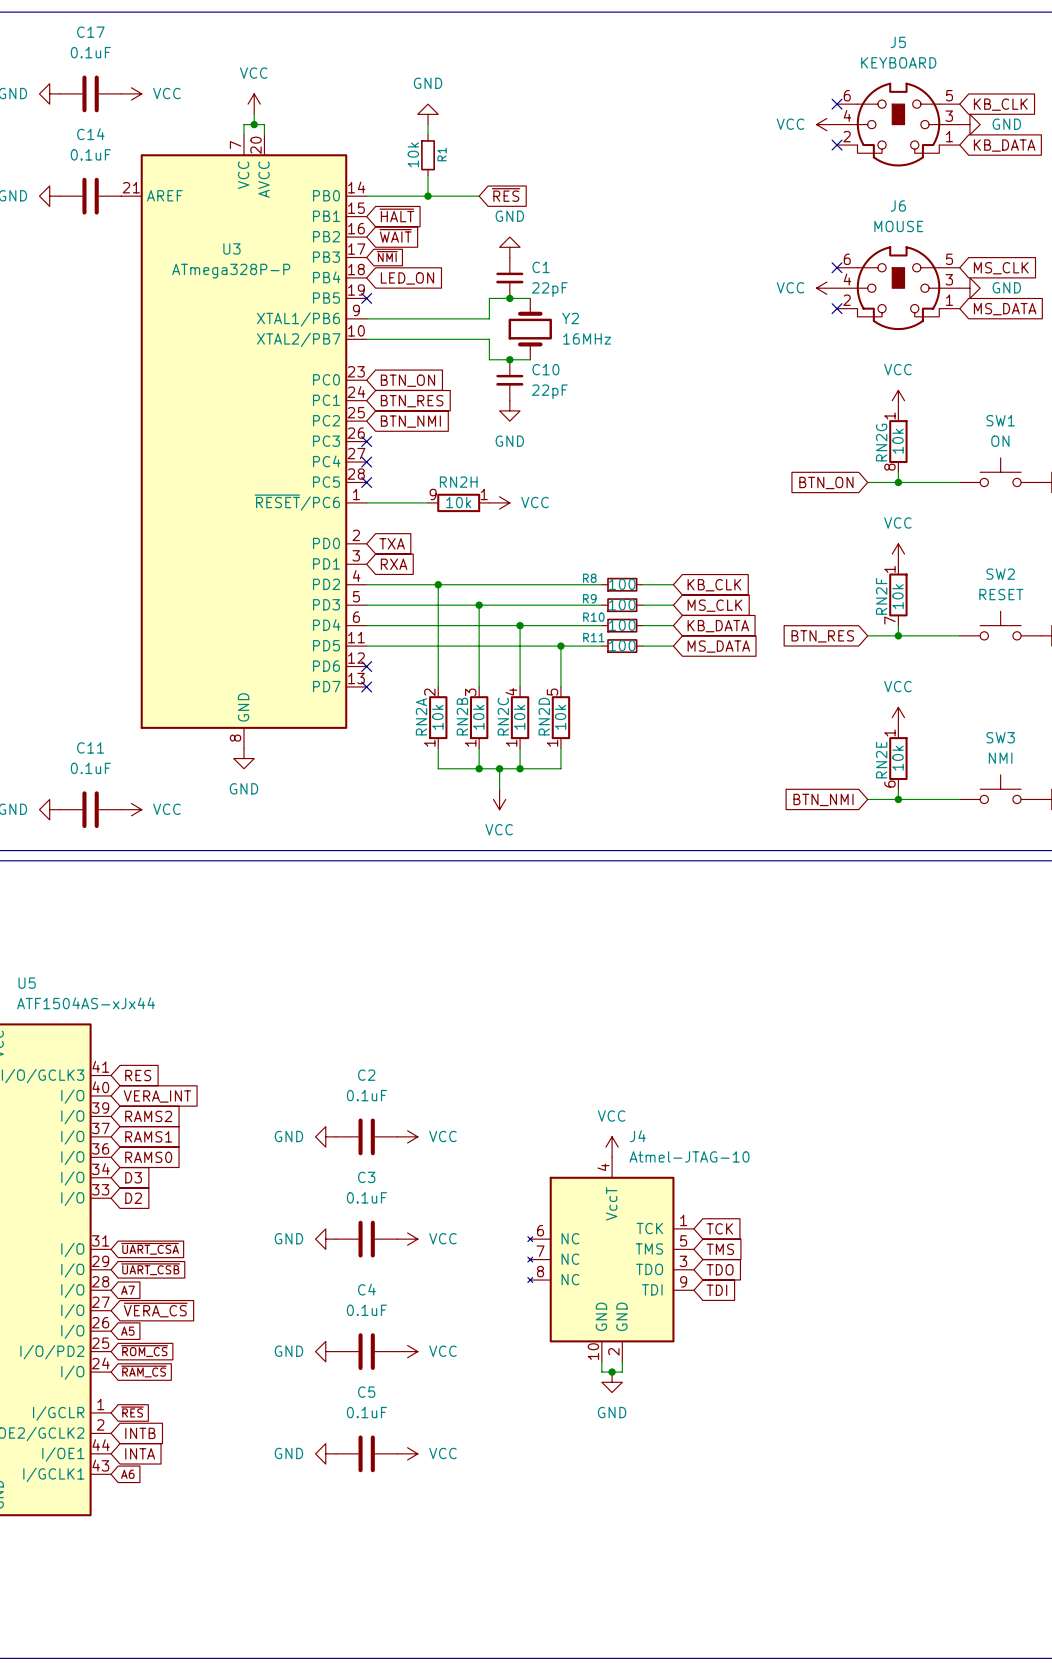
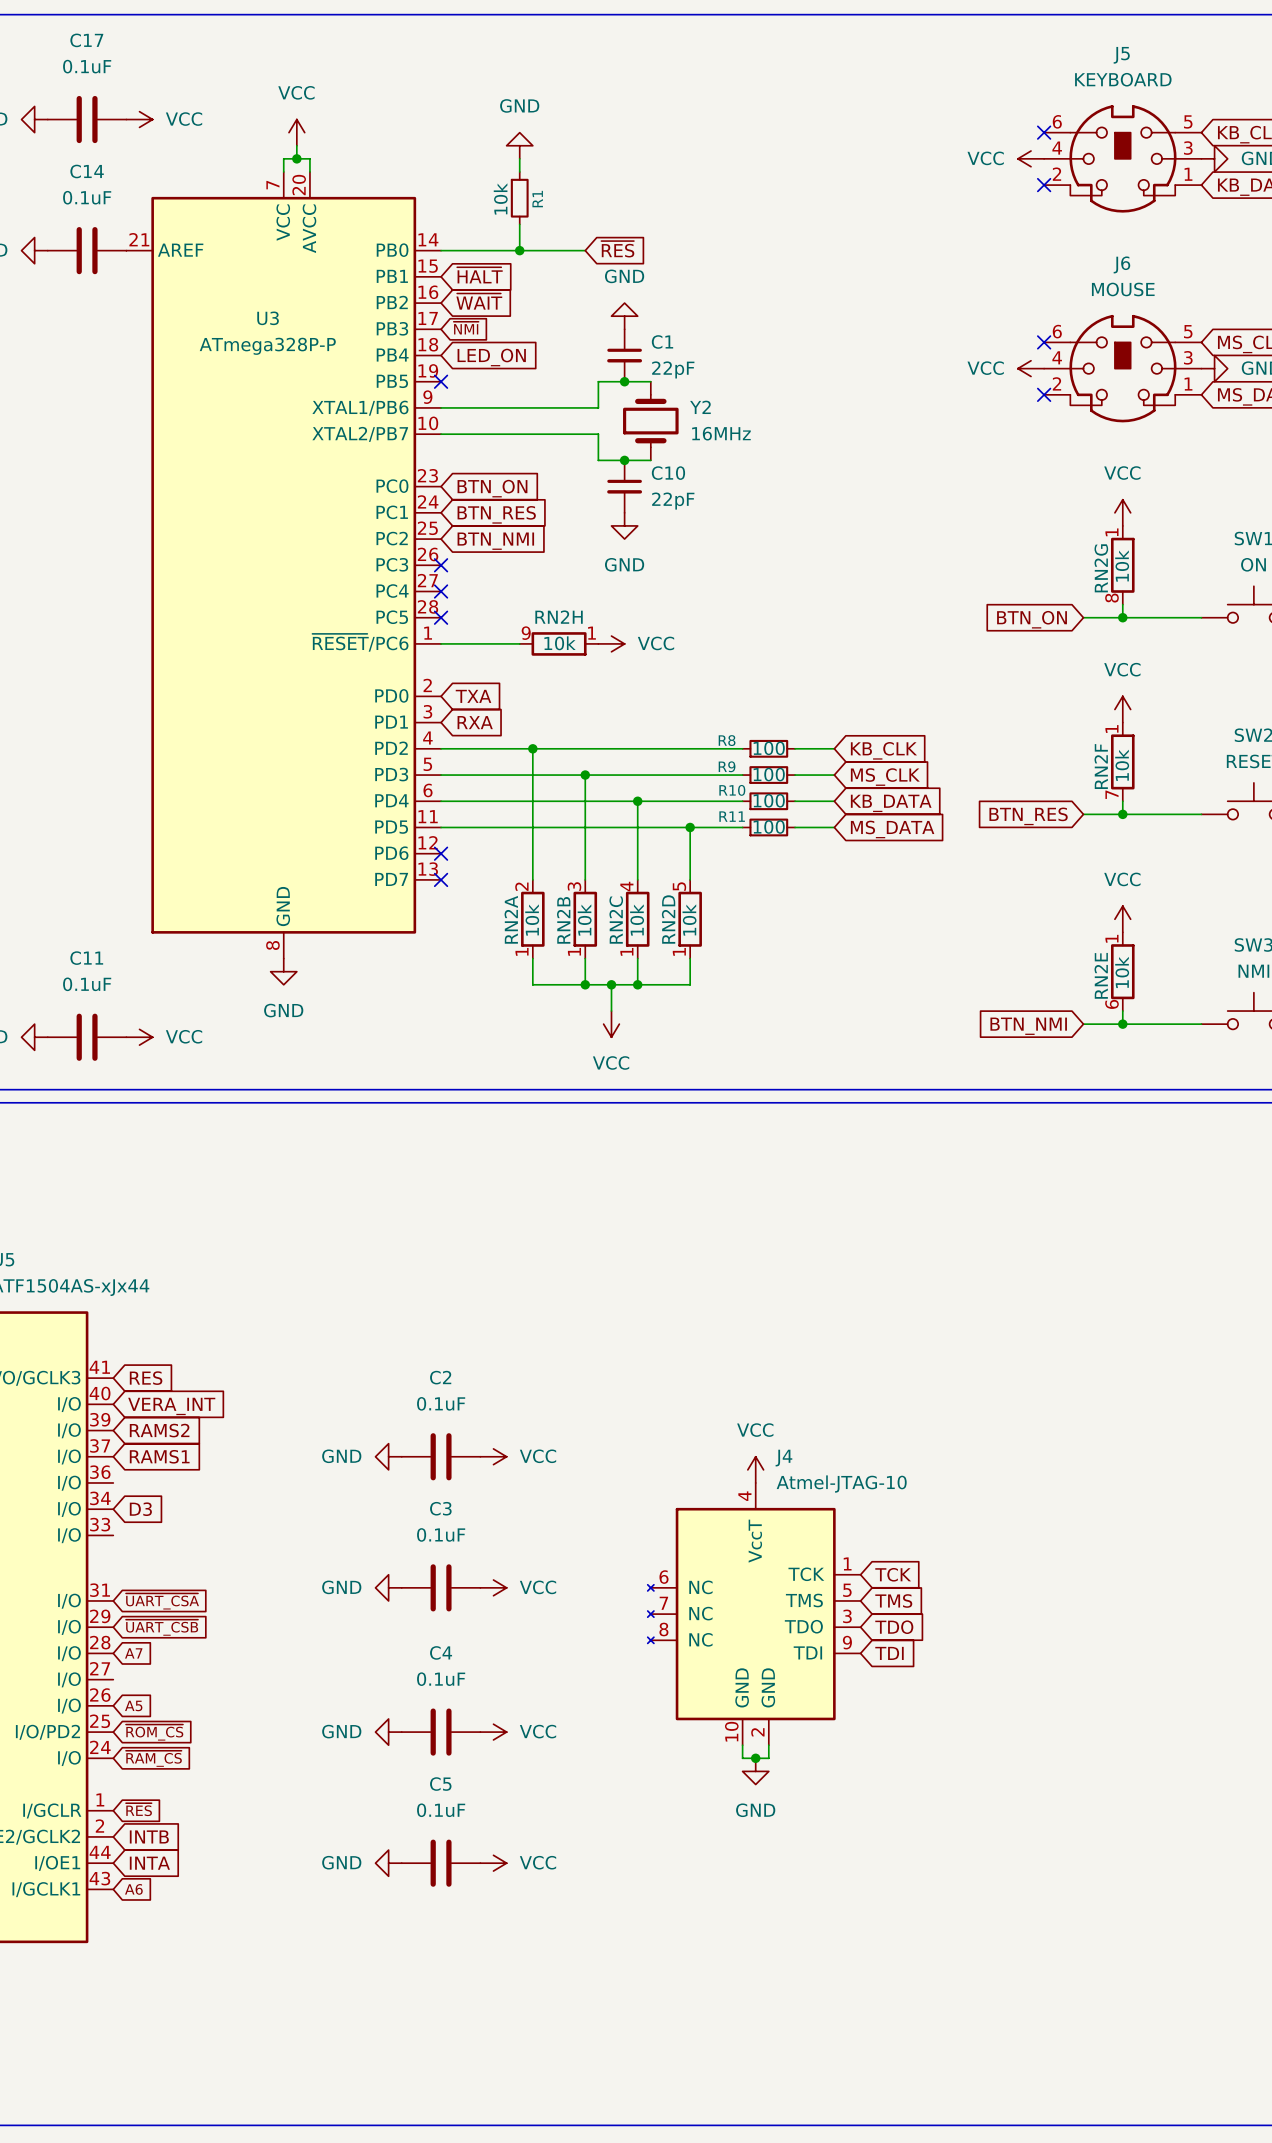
global label: RAMS0 (148, 1157) -> none
global label: D2 (133, 1198) -> none
global label: ~{VERA_CS} (155, 1310) -> none

